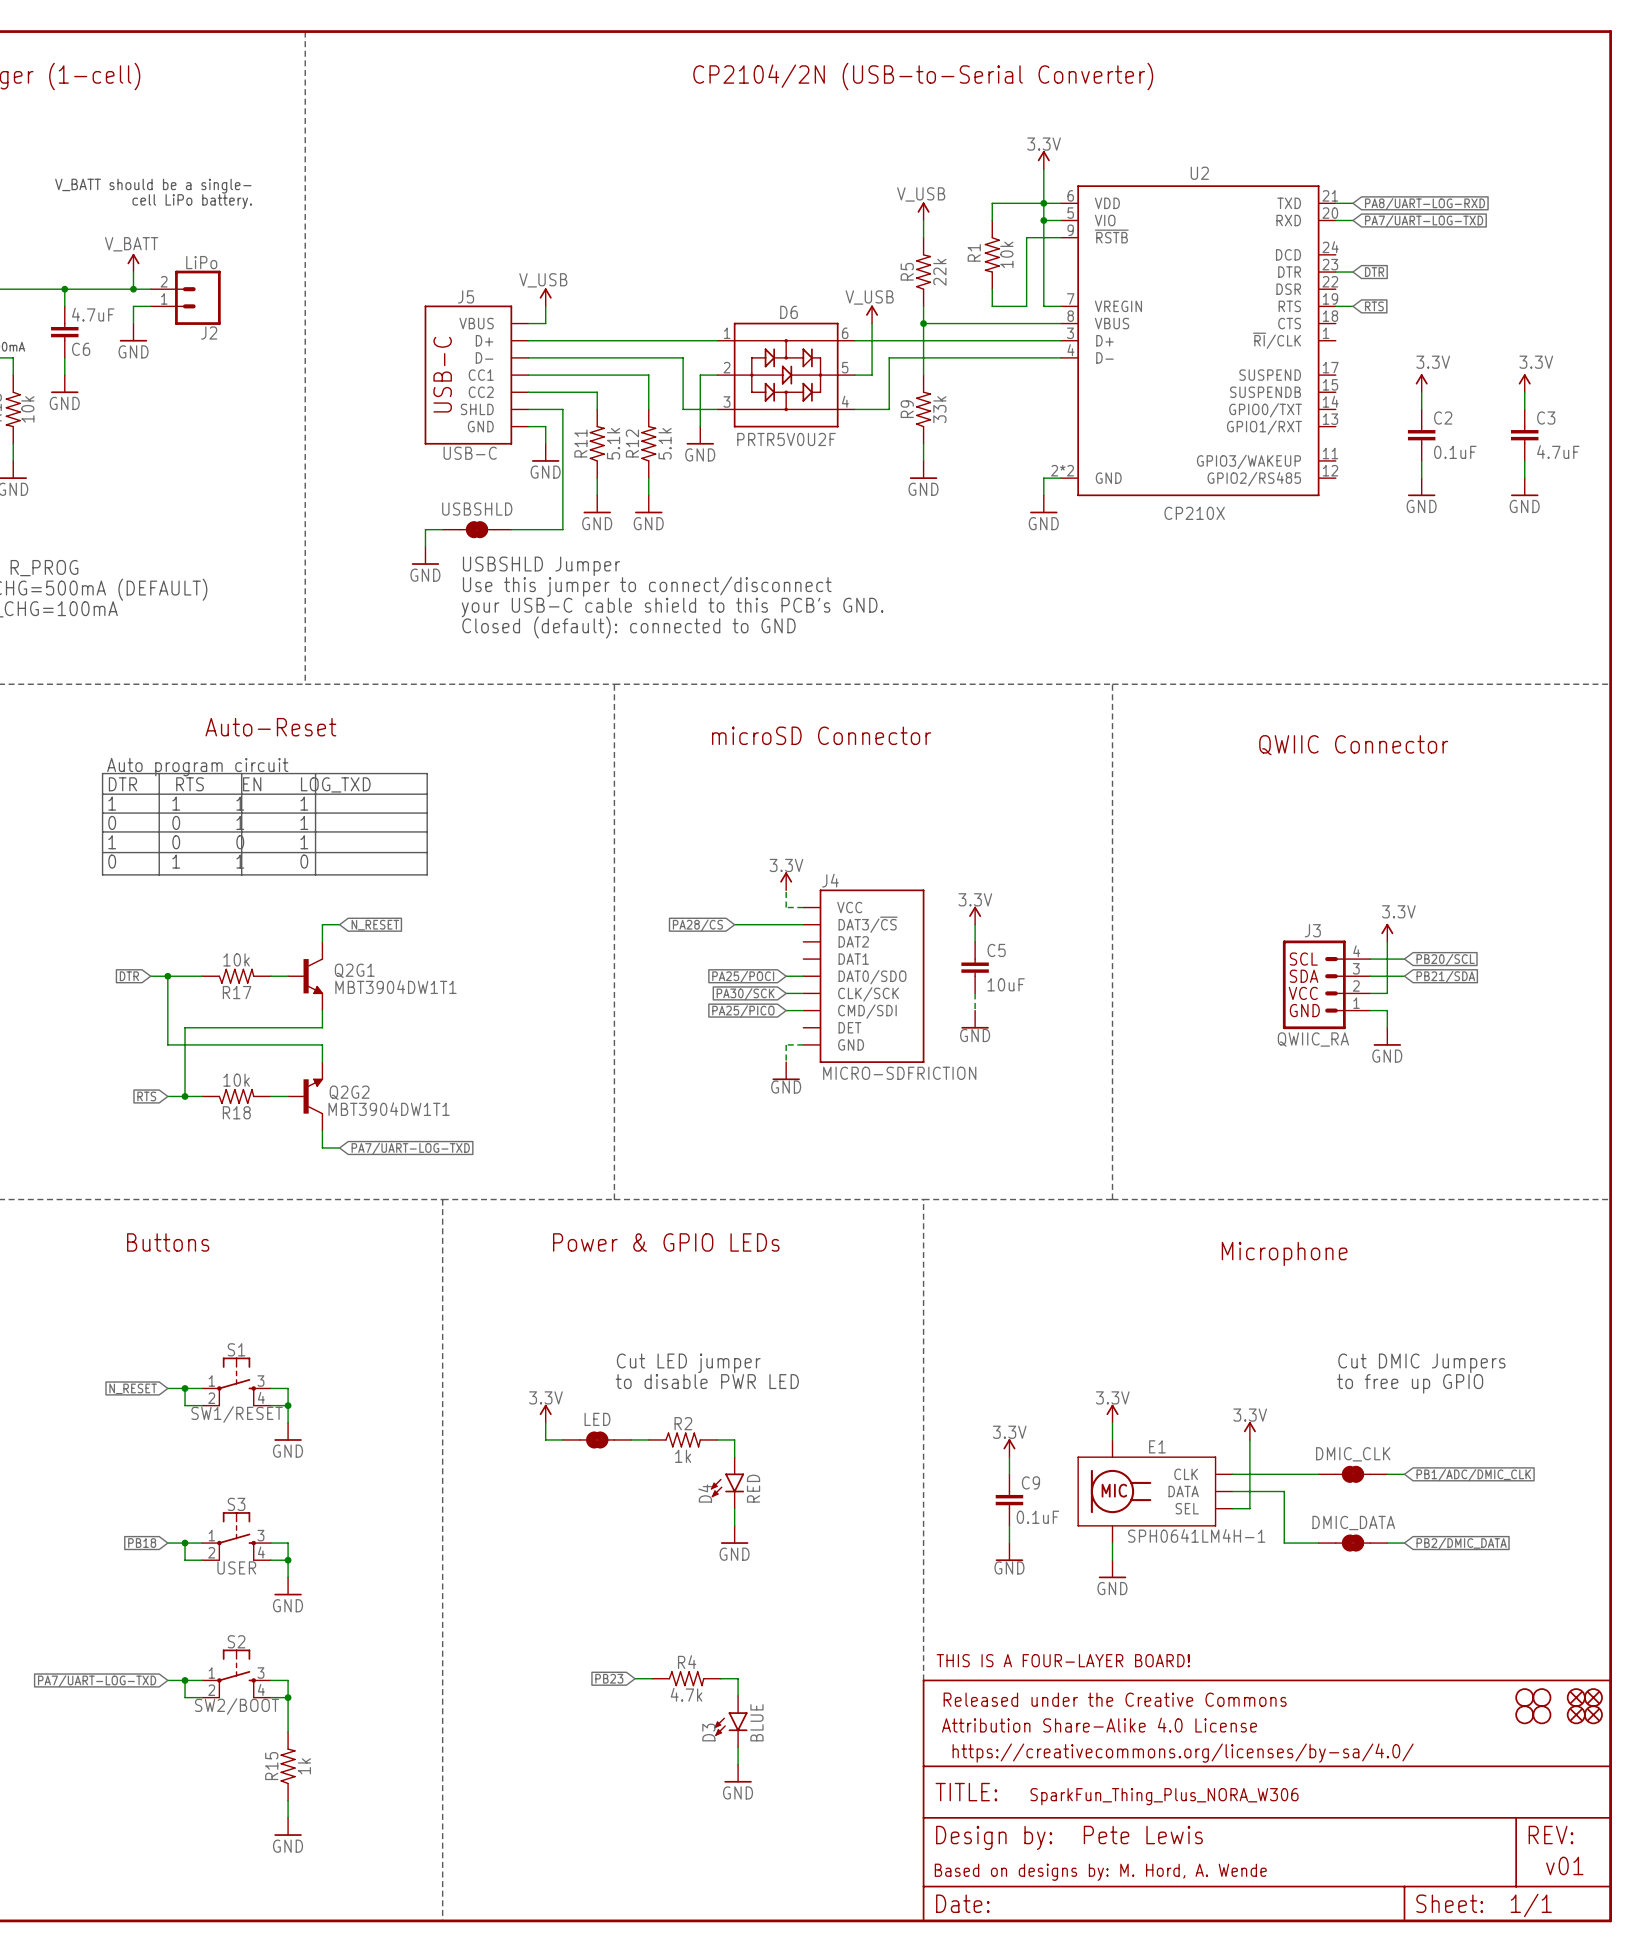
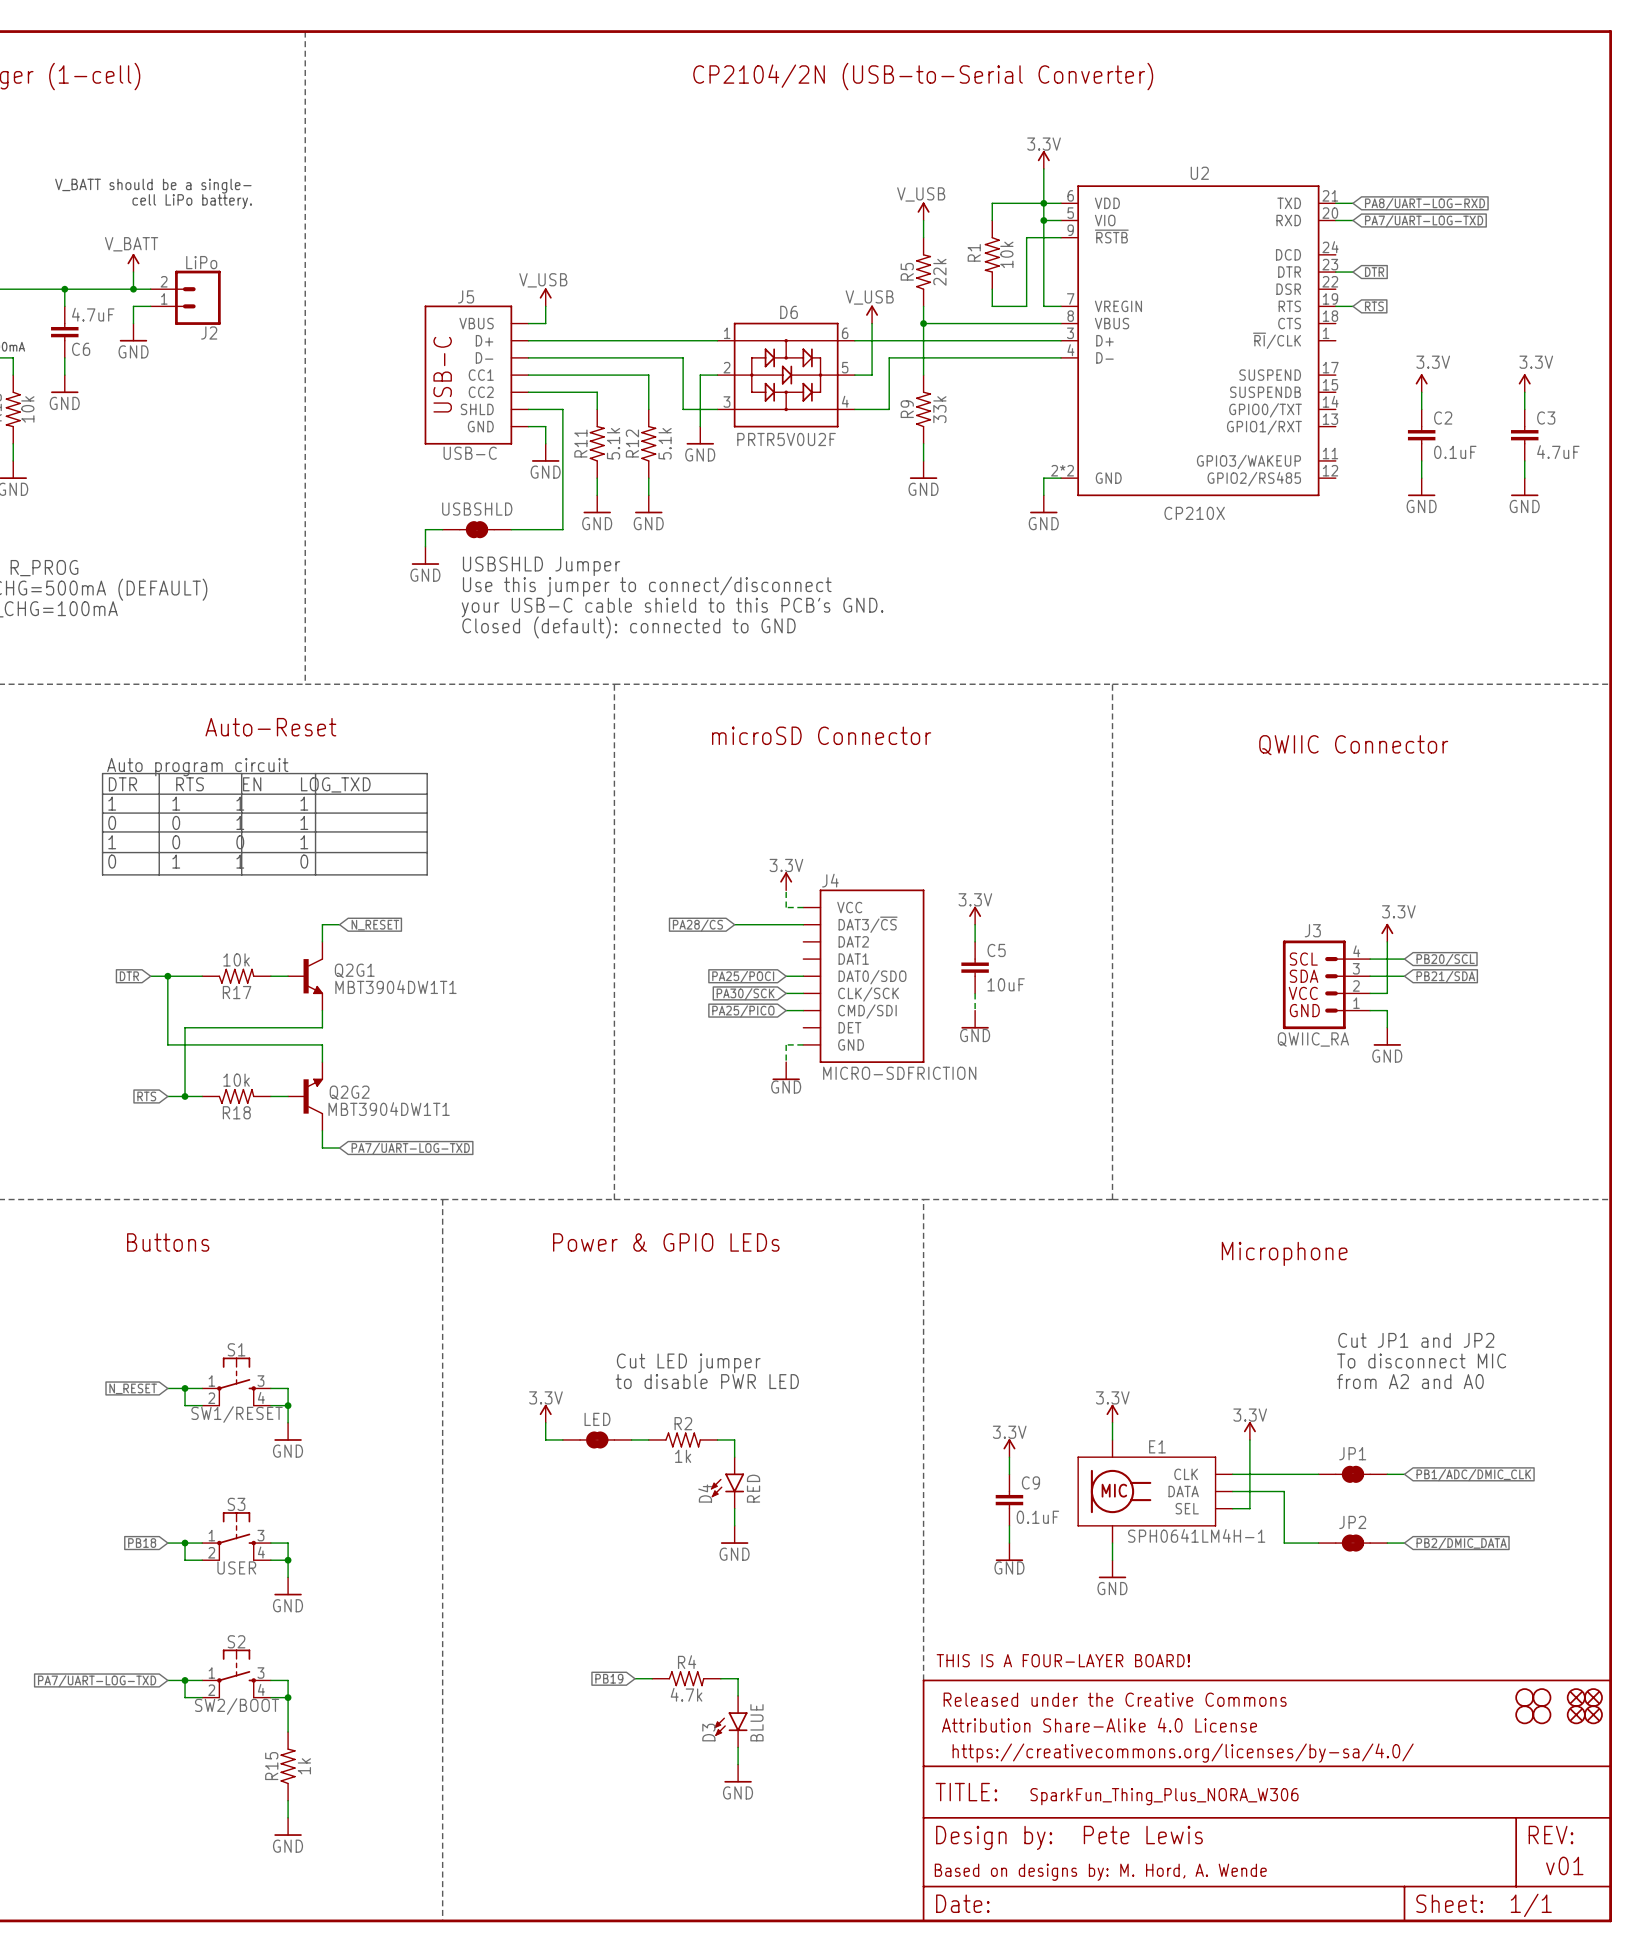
text: none -> Cut JP1 and JP2 (1416, 1340)
text: Cut DMIC Jumpers (1421, 1363) -> To disconnect MIC (1421, 1360)
text: to free up GPIO (1410, 1383) -> from A2 and A0 (1410, 1381)
DMIC_CLK name: DMIC_CLK (1353, 1454) -> JP1 (1352, 1453)
DMIC_DATA name: DMIC_DATA (1353, 1523) -> JP2 (1352, 1522)
global label: PB23 (609, 1678) -> PB19 (609, 1678)

